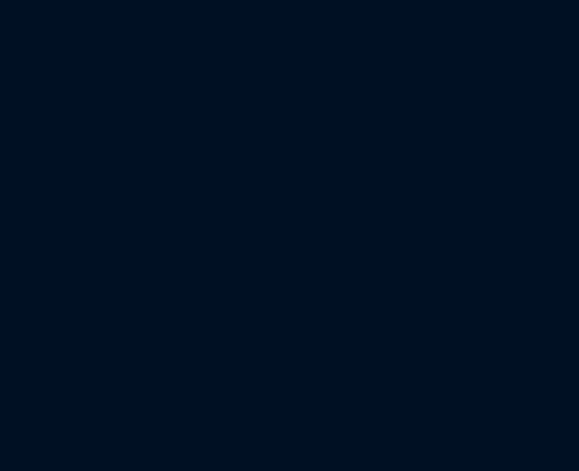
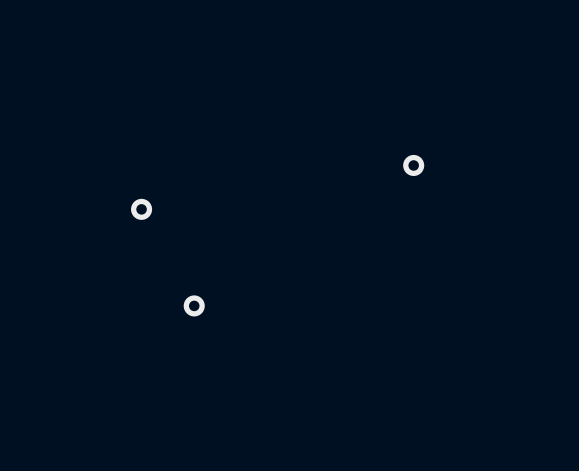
via: none -> (413, 165)
via: none -> (141, 209)
via: none -> (194, 305)

